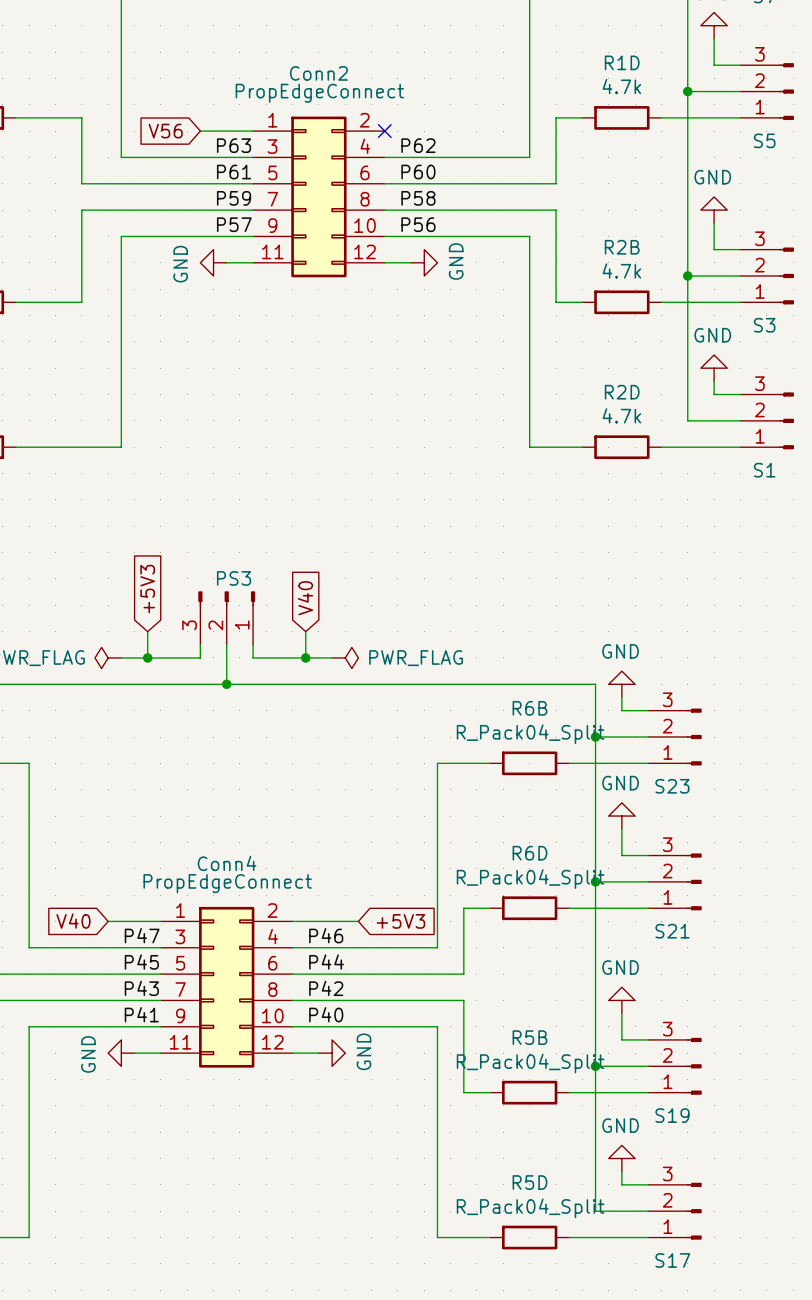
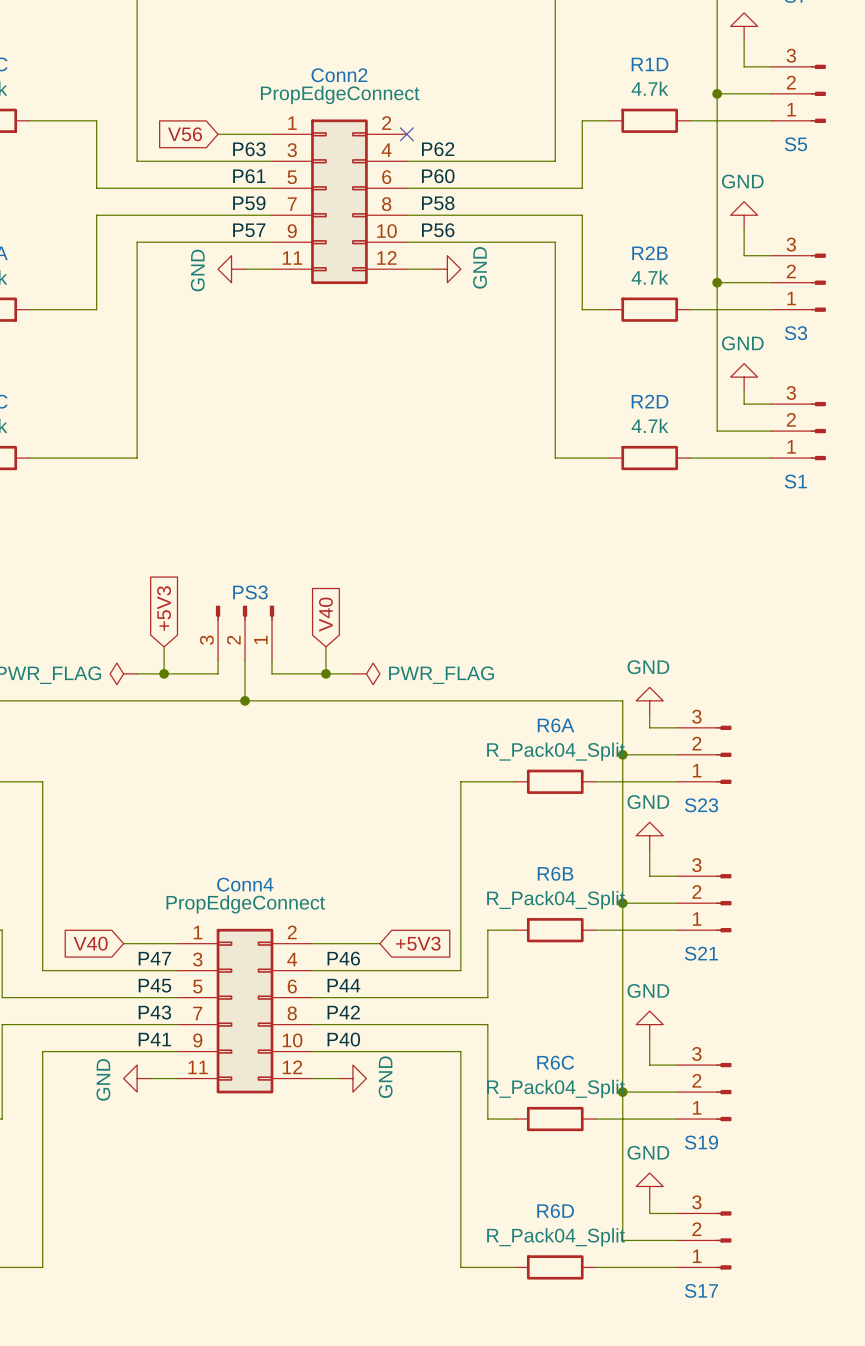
R6B name: R6B (529, 708) -> R6A (556, 725)
R6D name: R6D (529, 853) -> R6B (555, 873)
R5B name: R5B (529, 1037) -> R6C (555, 1062)
R5D name: R5D (529, 1182) -> R6D (555, 1211)

